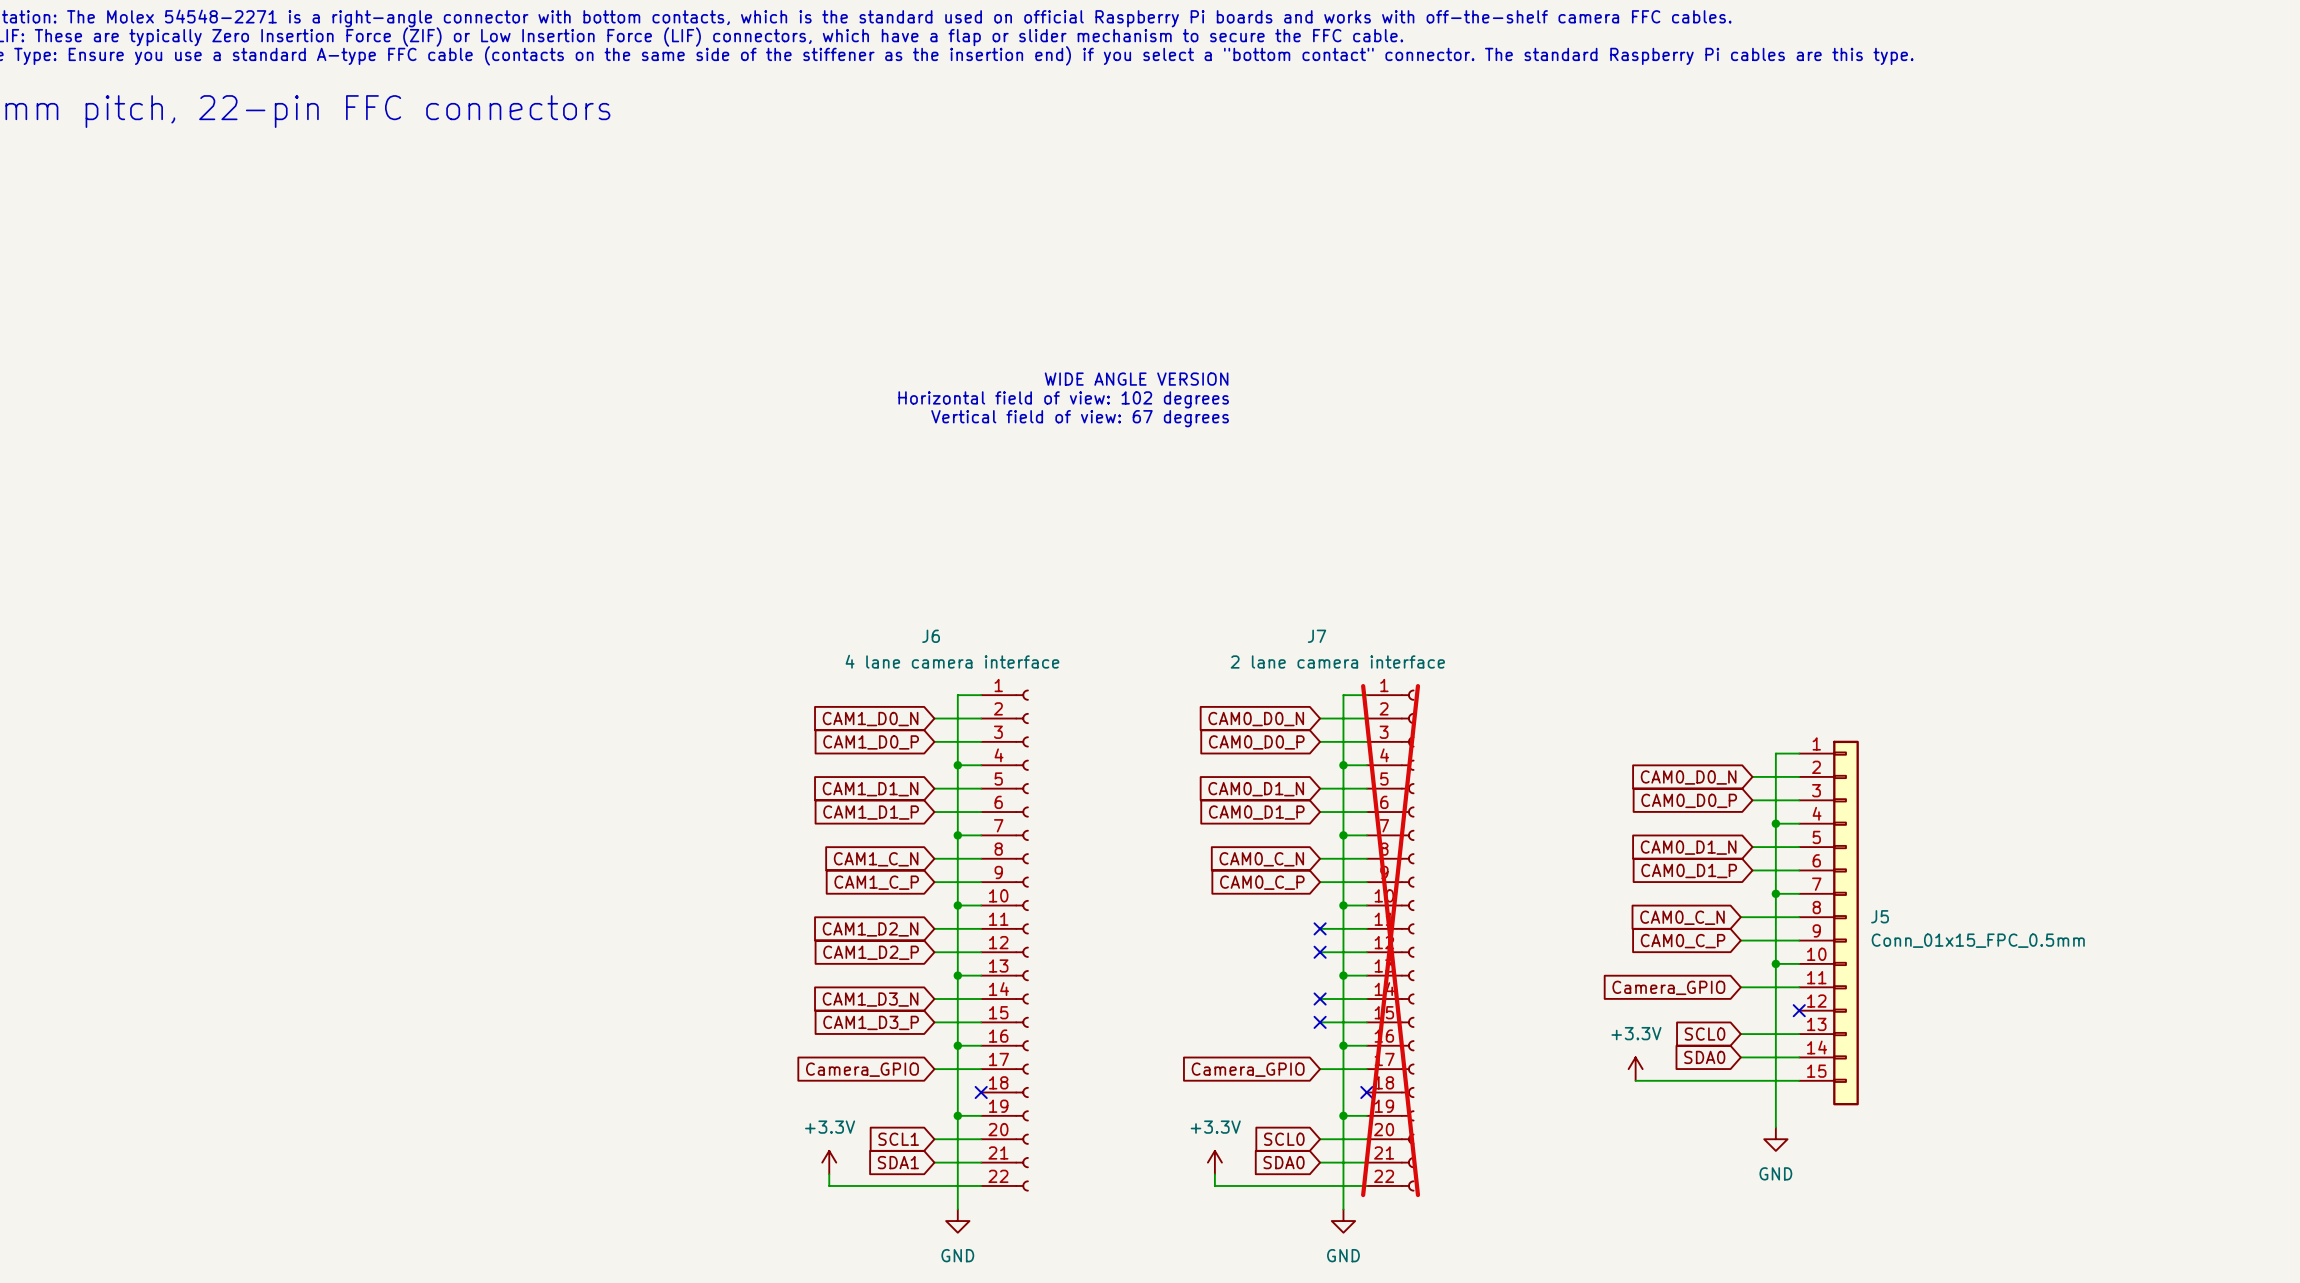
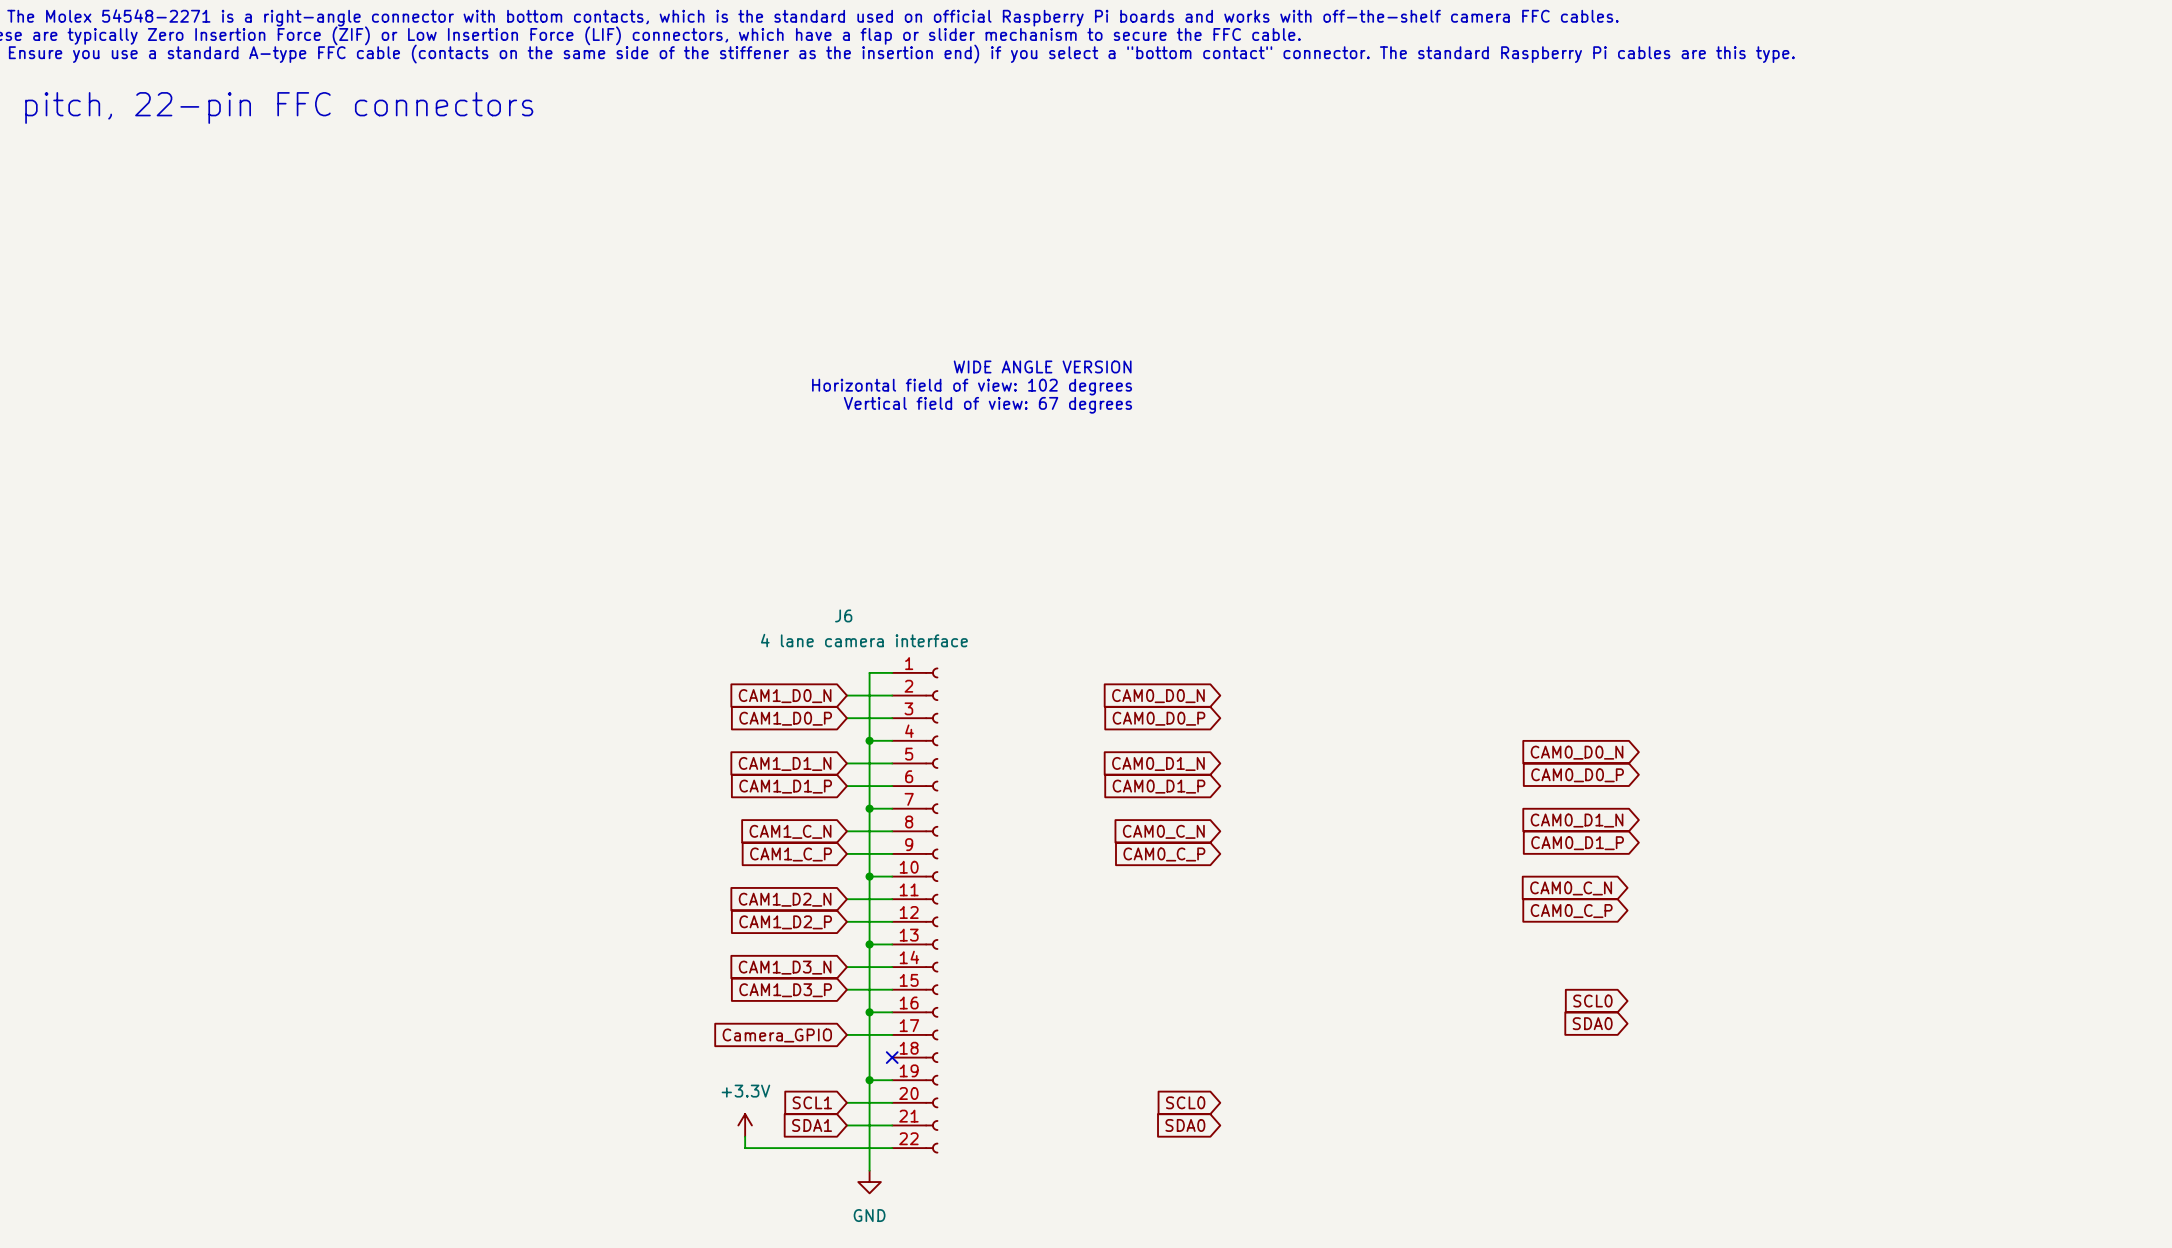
wire: (1366, 695) (1343, 695) (1343, 1209) -> none
wire: (1320, 718) (1366, 718) -> none
wire: (1320, 741) (1366, 741) -> none
wire: (1799, 753) (1775, 753) (1775, 1127) -> none
wire: (1343, 765) (1366, 765) -> none
junction: (1343, 765) -> none
wire: (1752, 776) (1799, 776) -> none
wire: (1320, 788) (1366, 788) -> none
wire: (1752, 800) (1799, 800) -> none
wire: (1320, 812) (1366, 812) -> none
wire: (1775, 823) (1799, 823) -> none
junction: (1775, 823) -> none
wire: (1343, 835) (1366, 835) -> none
junction: (1343, 835) -> none
wire: (1752, 847) (1799, 847) -> none
wire: (1320, 858) (1366, 858) -> none
wire: (1752, 870) (1799, 870) -> none
wire: (1320, 882) (1366, 882) -> none
wire: (1775, 893) (1799, 893) -> none
junction: (1775, 893) -> none
wire: (1343, 905) (1366, 905) -> none
junction: (1343, 905) -> none
wire: (1740, 917) (1799, 917) -> none
J5: Conn_01x15_FPC_0.5mm (1829, 923) -> none
wire: (1320, 928) (1366, 928) -> none
no-connect mark: (1320, 928) -> none
J7: 2 lane camera interface (1390, 940) -> none
wire: (1740, 940) (1799, 940) -> none
wire: (1320, 952) (1366, 952) -> none
no-connect mark: (1320, 952) -> none
wire: (1775, 963) (1799, 963) -> none
junction: (1775, 963) -> none
wire: (1343, 975) (1366, 975) -> none
junction: (1343, 975) -> none
global label: Camera_GPIO (1668, 987) -> none
wire: (1740, 987) (1799, 987) -> none
wire: (1320, 999) (1366, 999) -> none
no-connect mark: (1320, 999) -> none
no-connect mark: (1799, 1010) -> none
wire: (1320, 1022) (1366, 1022) -> none
no-connect mark: (1320, 1022) -> none
wire: (1740, 1034) (1799, 1034) -> none
wire: (1343, 1045) (1366, 1045) -> none
junction: (1343, 1045) -> none
wire: (1740, 1057) (1799, 1057) -> none
global label: Camera_GPIO (1248, 1069) -> none
wire: (1320, 1069) (1366, 1069) -> none
power symbol: +3.3V (1635, 1069) -> none
wire: (1635, 1080) (1799, 1080) -> none
no-connect mark: (1366, 1092) -> none
wire: (1343, 1115) (1366, 1115) -> none
junction: (1343, 1115) -> none
wire: (1320, 1139) (1366, 1139) -> none
power symbol: GND (1775, 1139) -> none
power symbol: +3.3V (1214, 1162) -> none
wire: (1320, 1162) (1366, 1162) -> none
wire: (1214, 1174) (1214, 1185) (1366, 1185) -> none
power symbol: GND (1343, 1221) -> none

